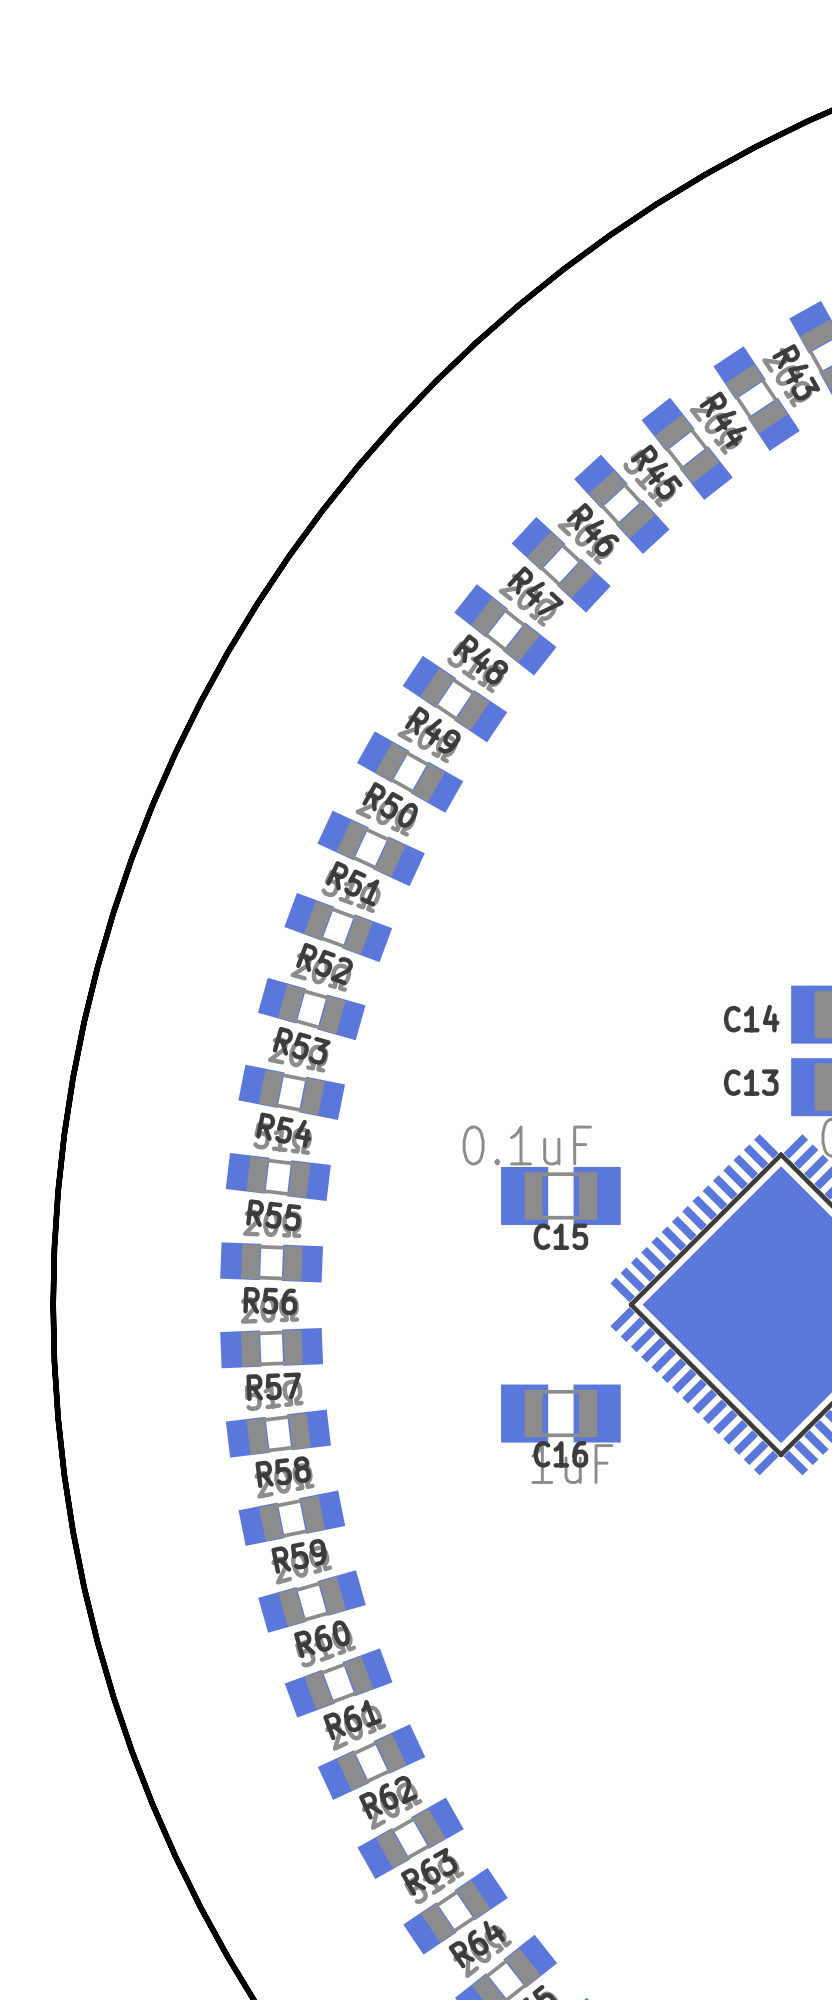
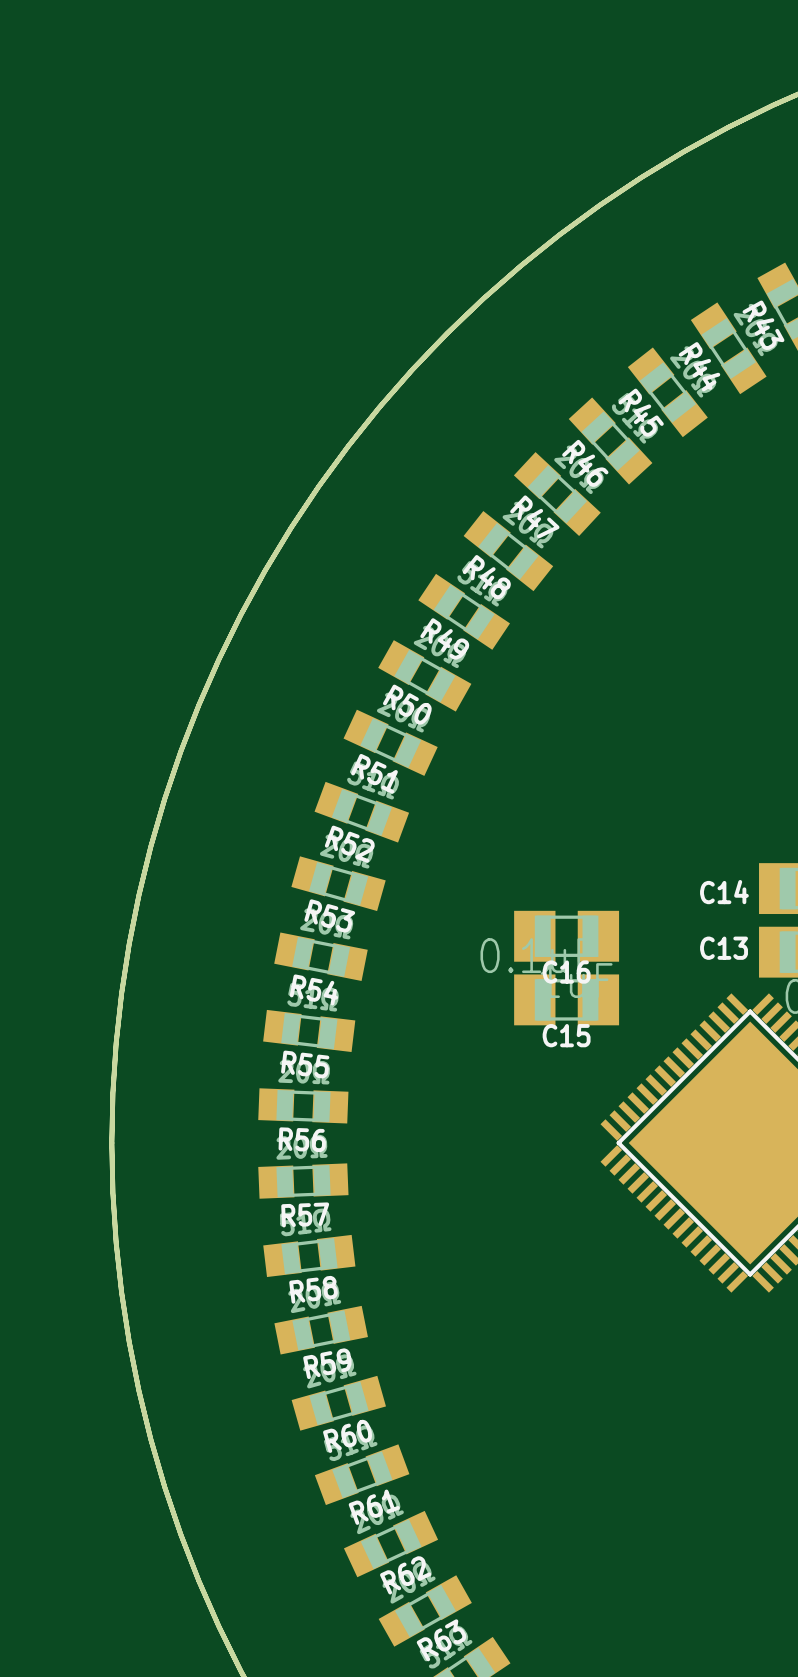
C15 position: (560, 1195) -> (566, 999)
C16 position: (560, 1413) -> (566, 936)

